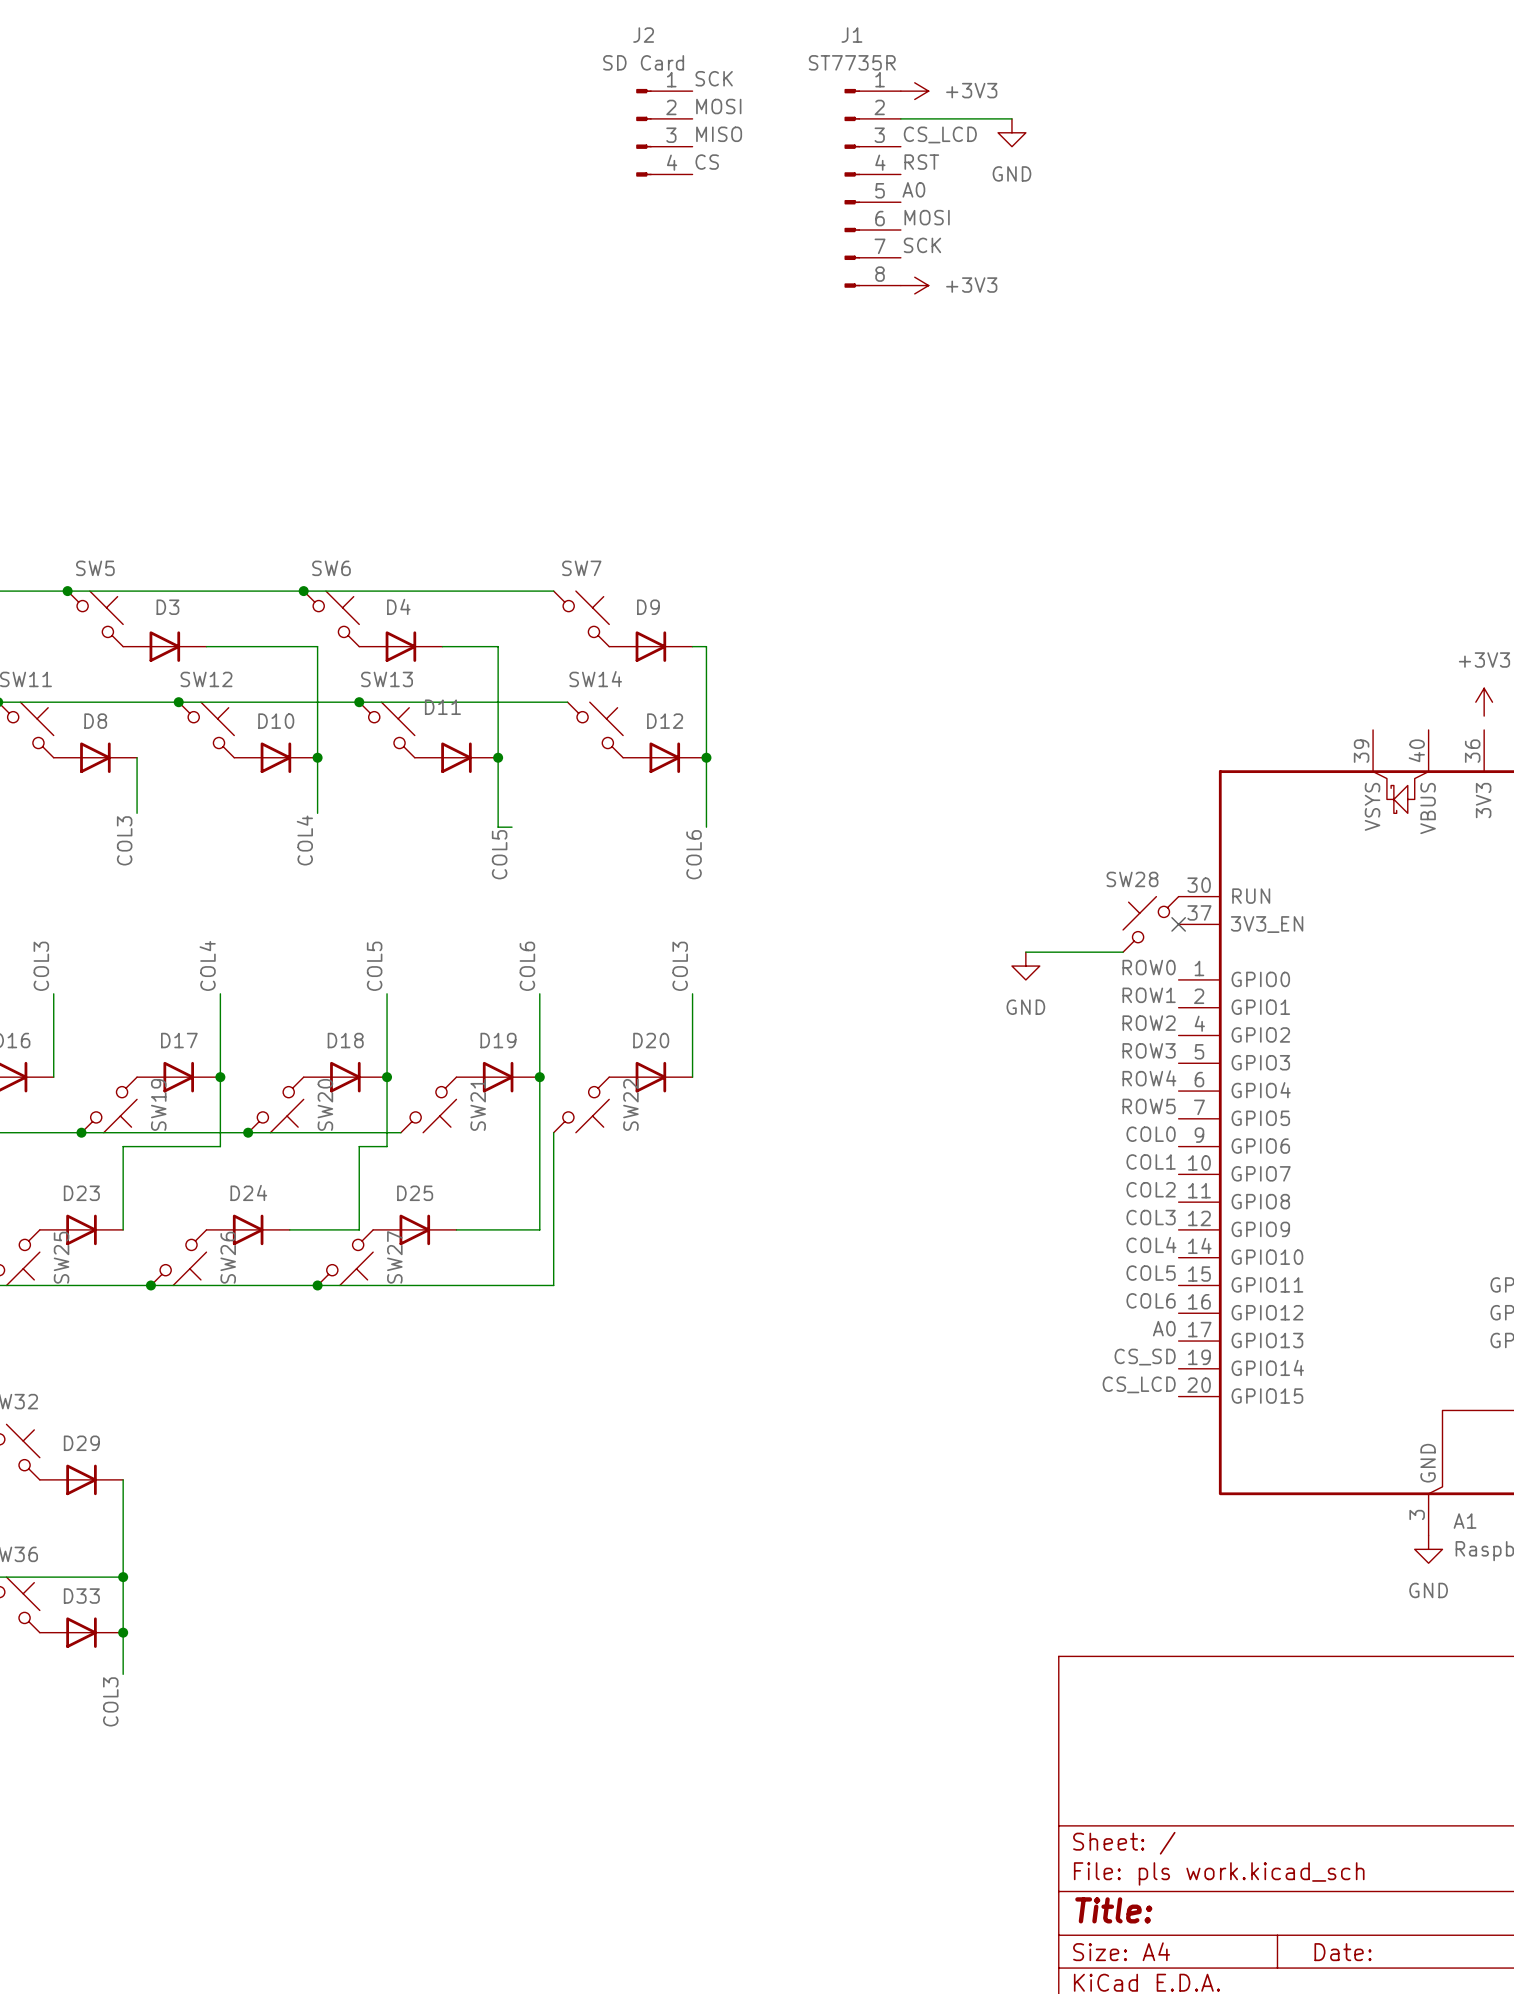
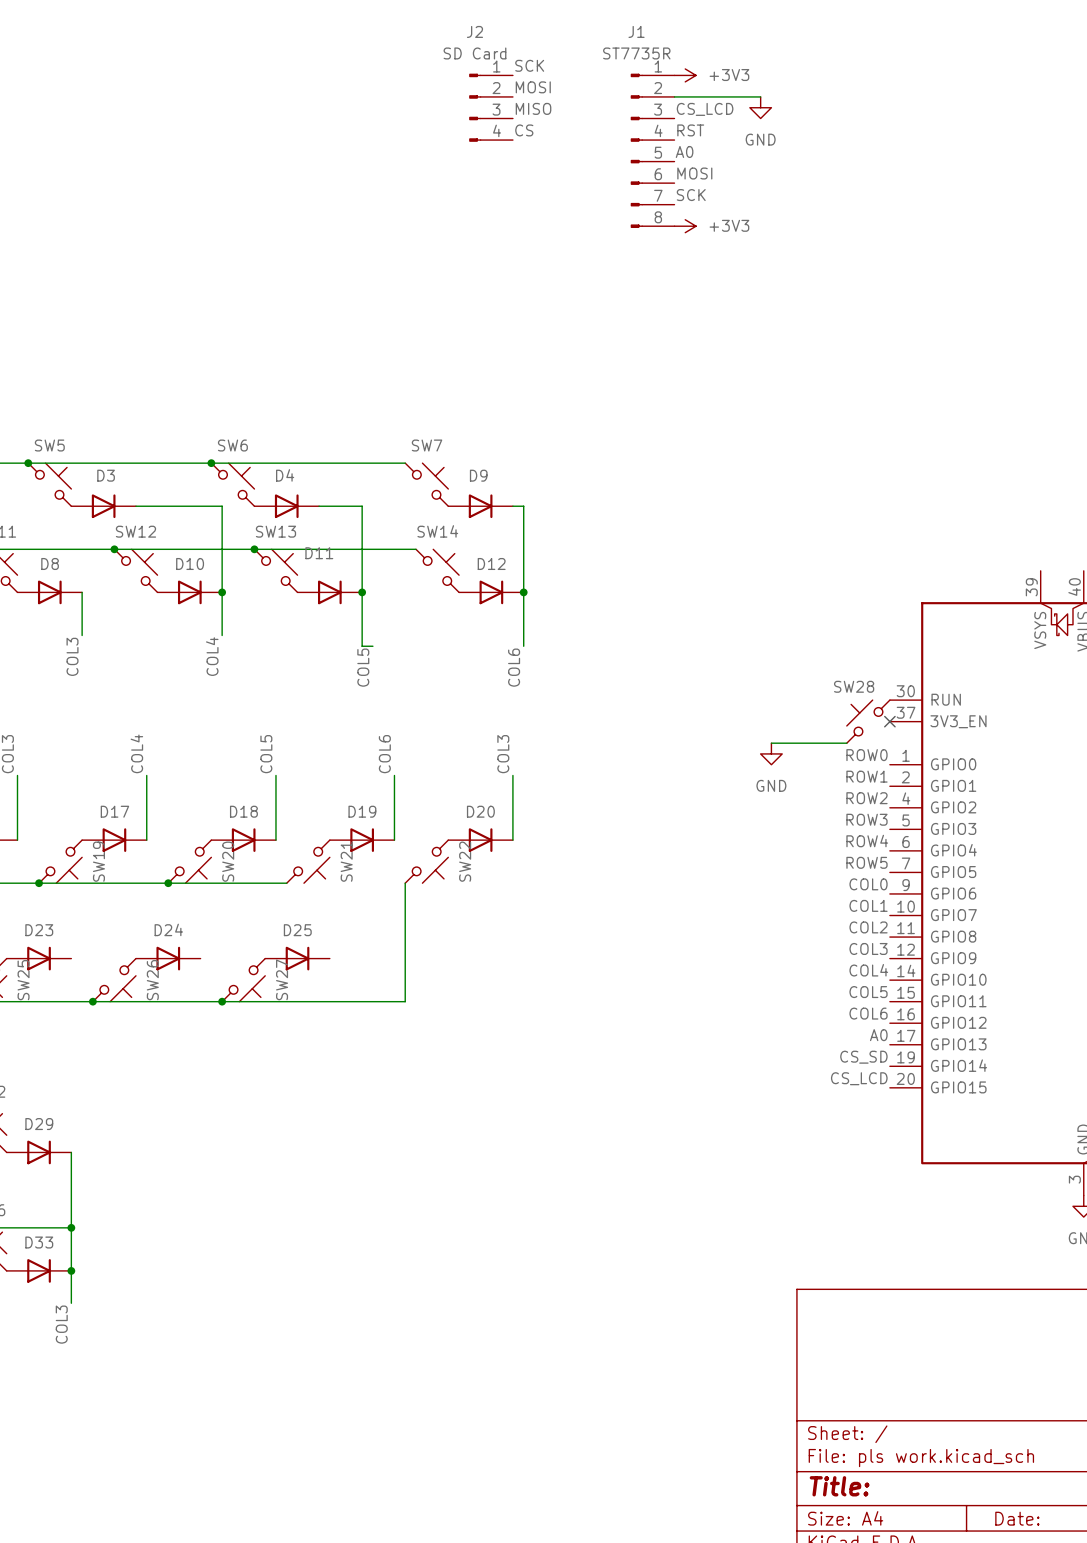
wire: (220, 1077) (220, 1146) (123, 1146) (123, 1229) -> none
junction: (220, 1077) -> none
wire: (387, 1077) (387, 1146) (359, 1146) (359, 1229) (289, 1229) -> none
junction: (387, 1077) -> none
wire: (539, 1077) (539, 1229) (456, 1229) -> none
junction: (539, 1077) -> none

